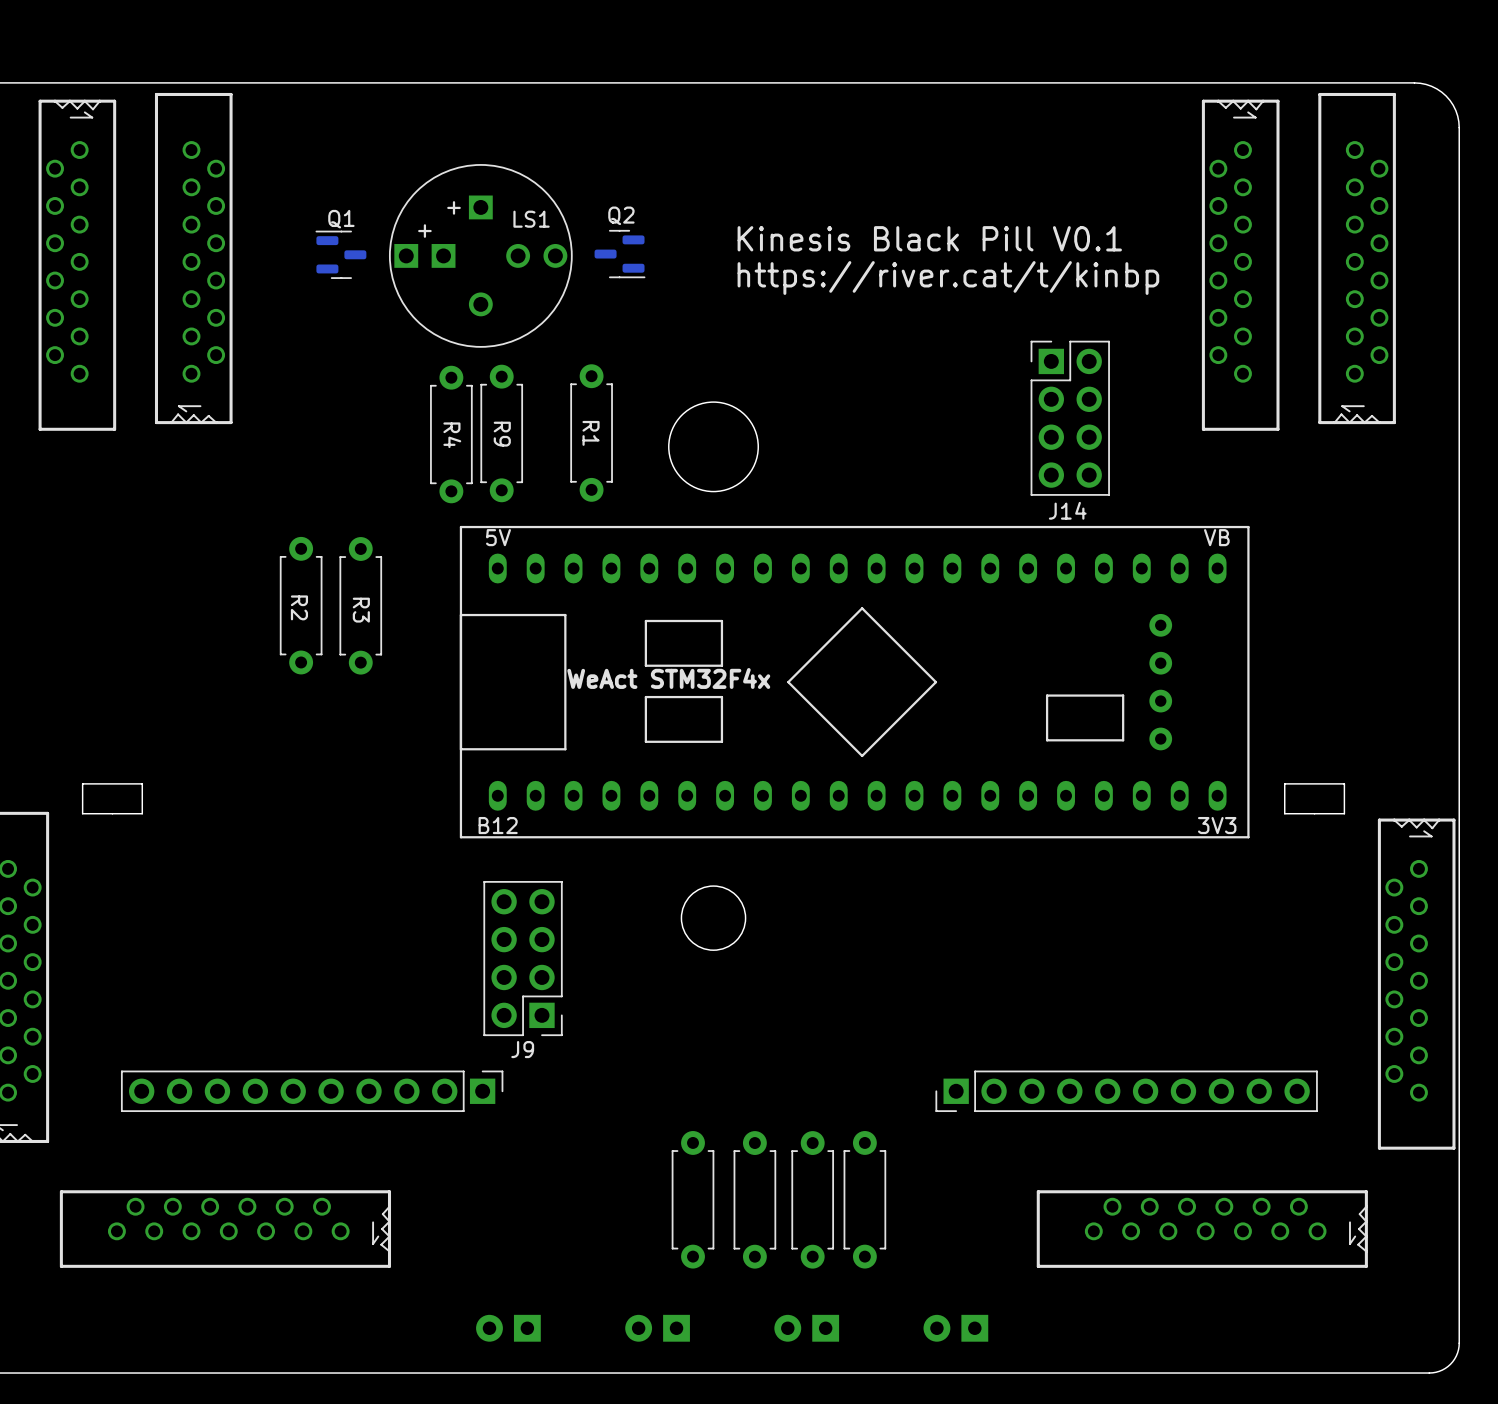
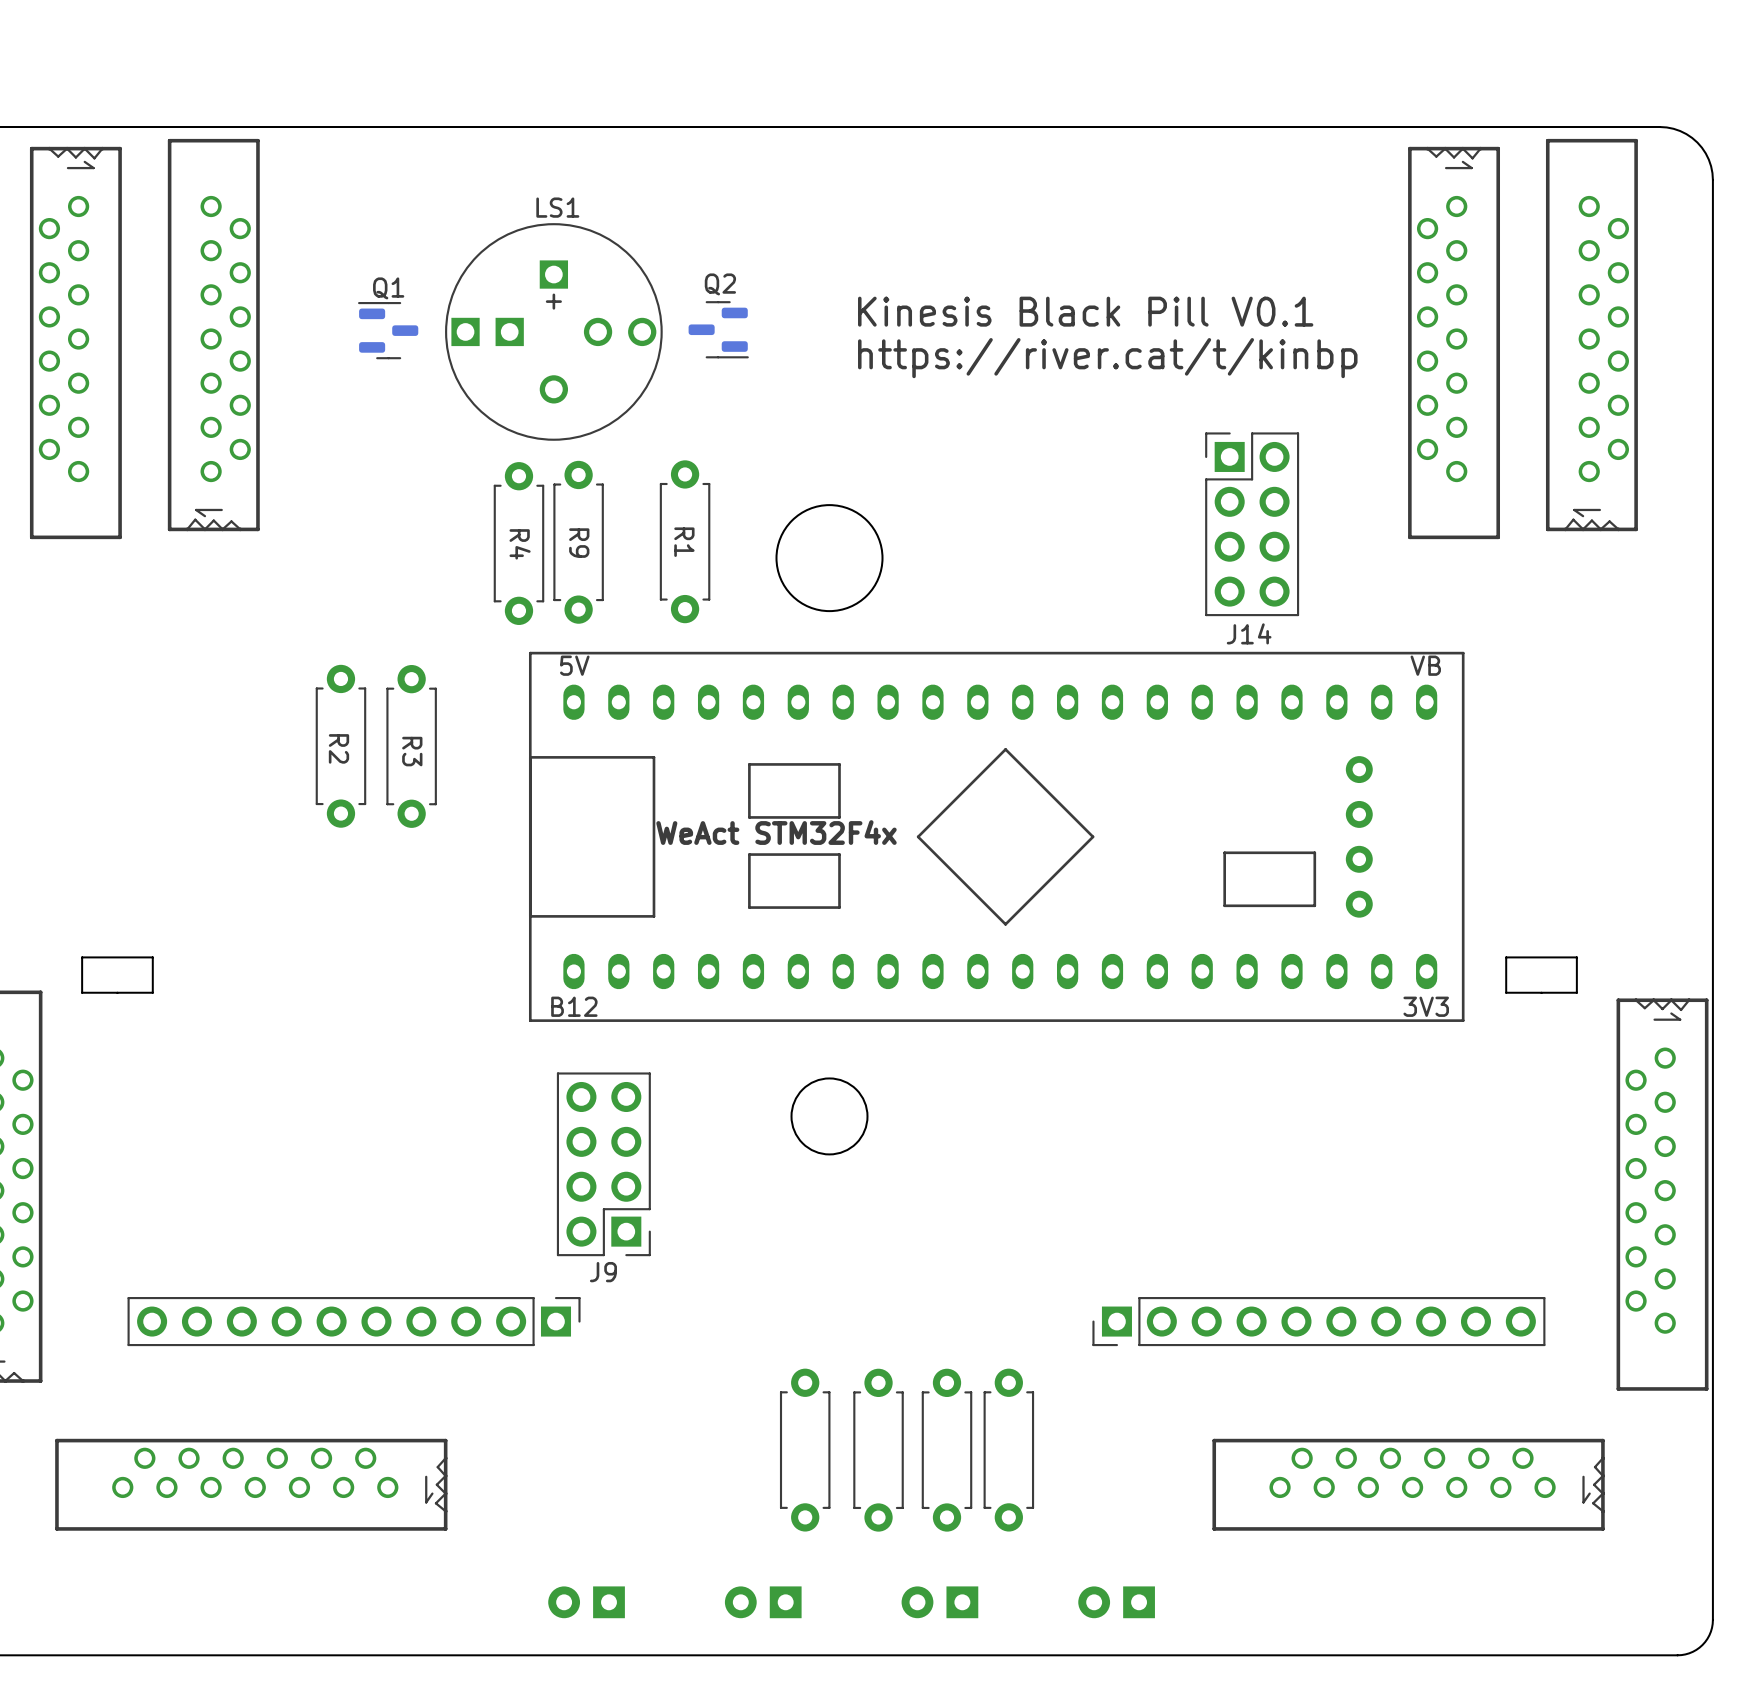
LS1 text position: + (453, 207) -> + (553, 301)
LS1 name position: LS1 (531, 219) -> LS1 (557, 207)
LS1 text: + (424, 231) -> none

